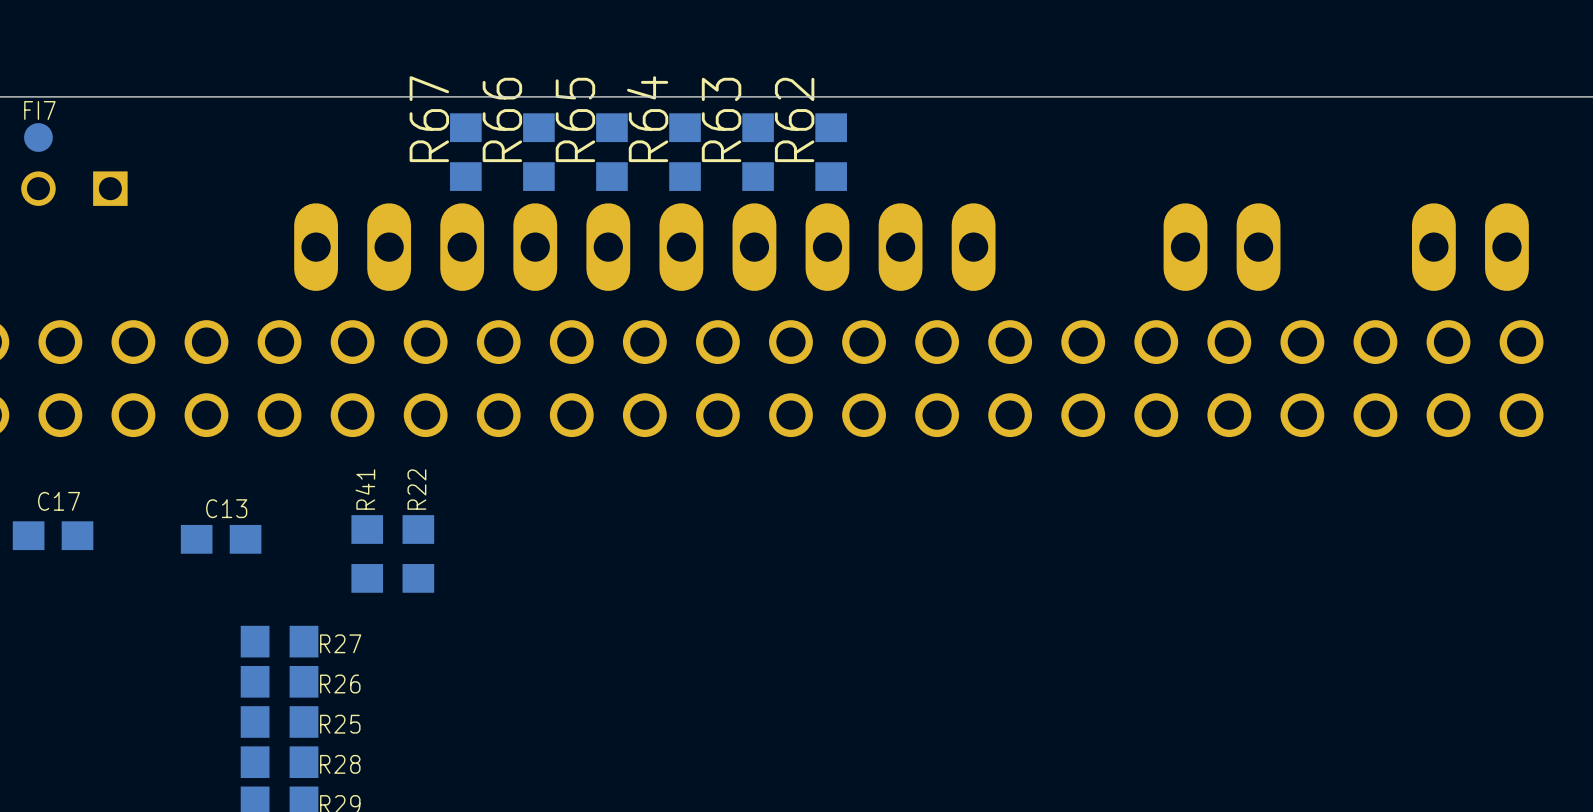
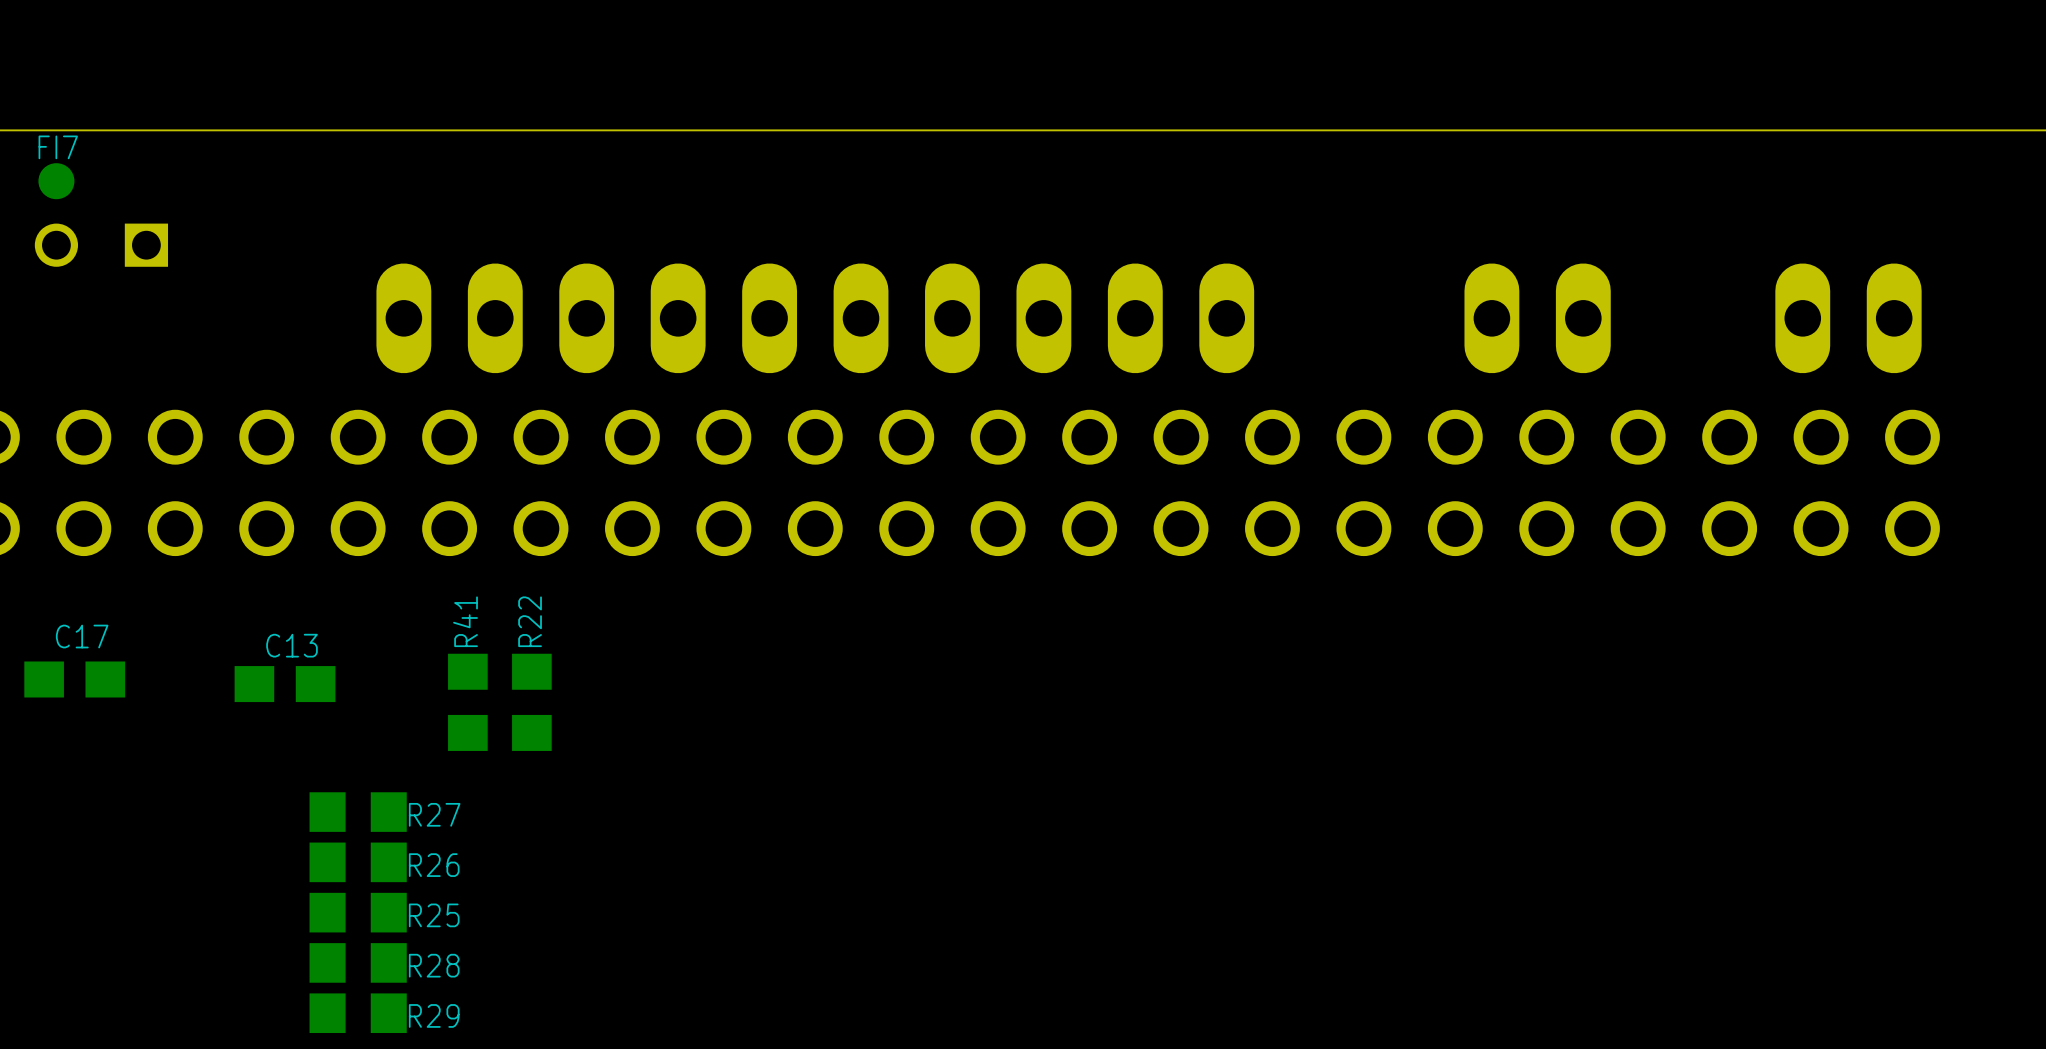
R67: (465, 152) -> none
R66: (538, 152) -> none
R65: (611, 152) -> none
R64: (685, 152) -> none
R63: (758, 152) -> none
R62: (831, 152) -> none

